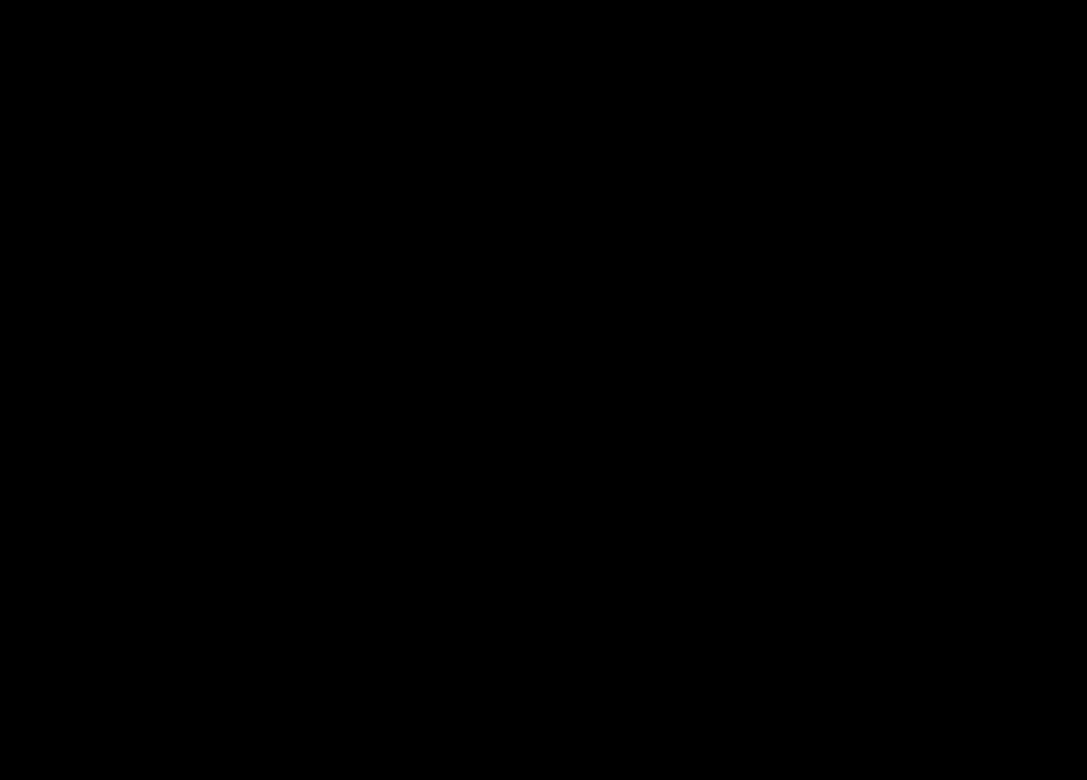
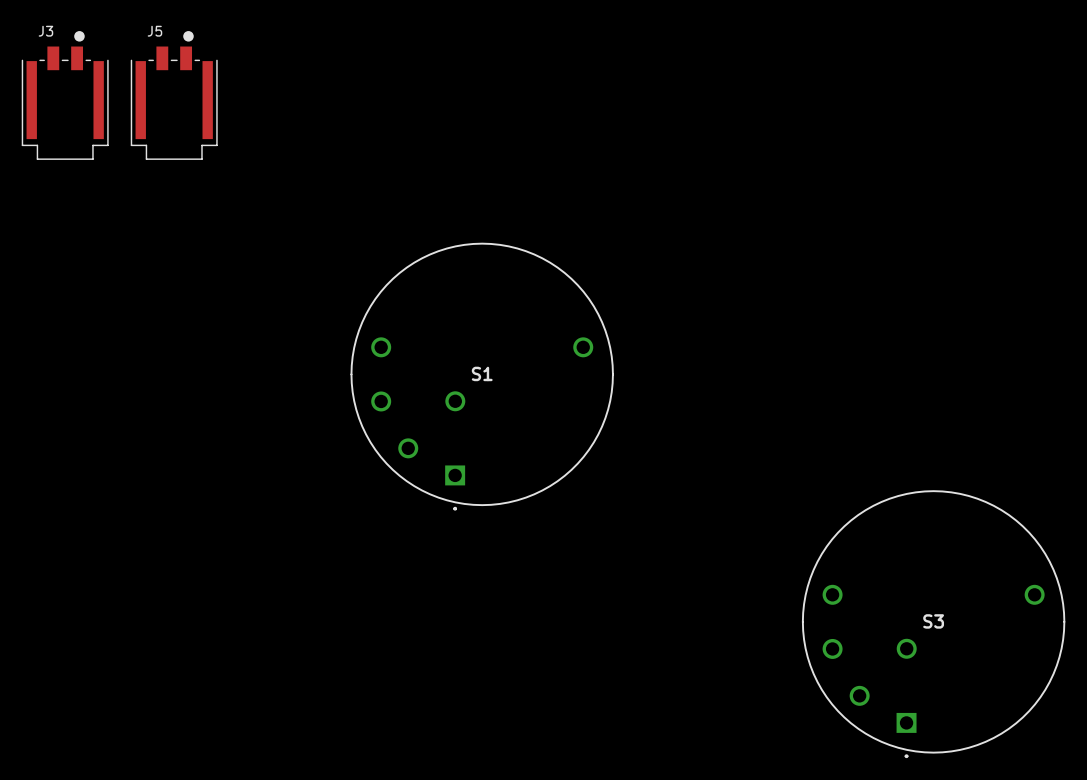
J3: none -> (65, 95)
J5: none -> (174, 95)
S1: none -> (482, 376)
S3: none -> (933, 624)

